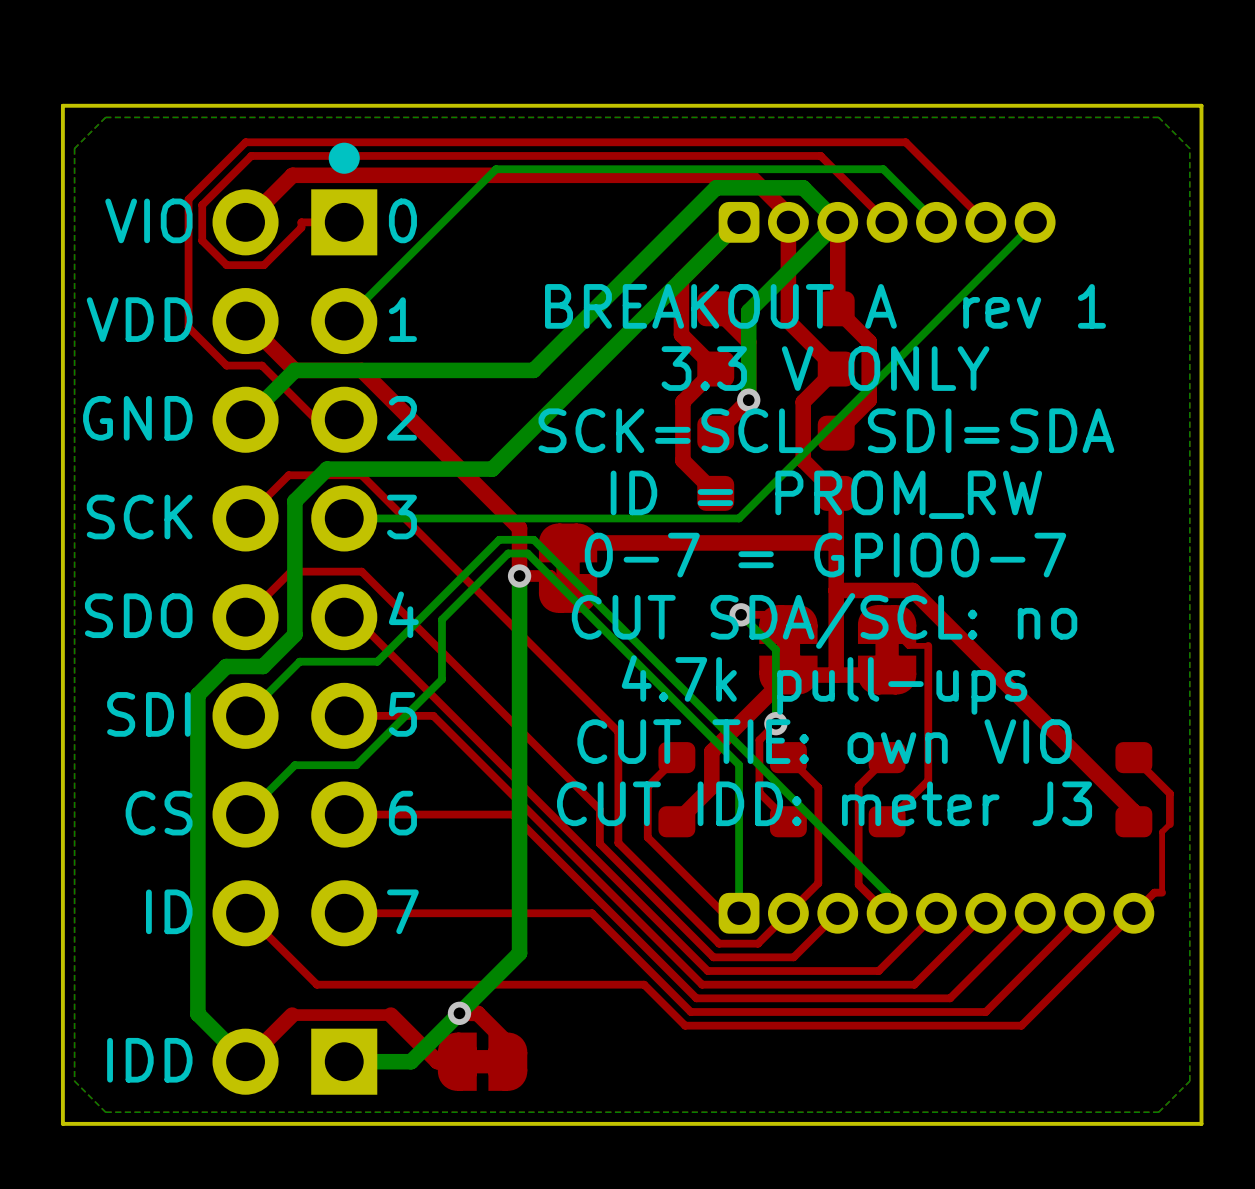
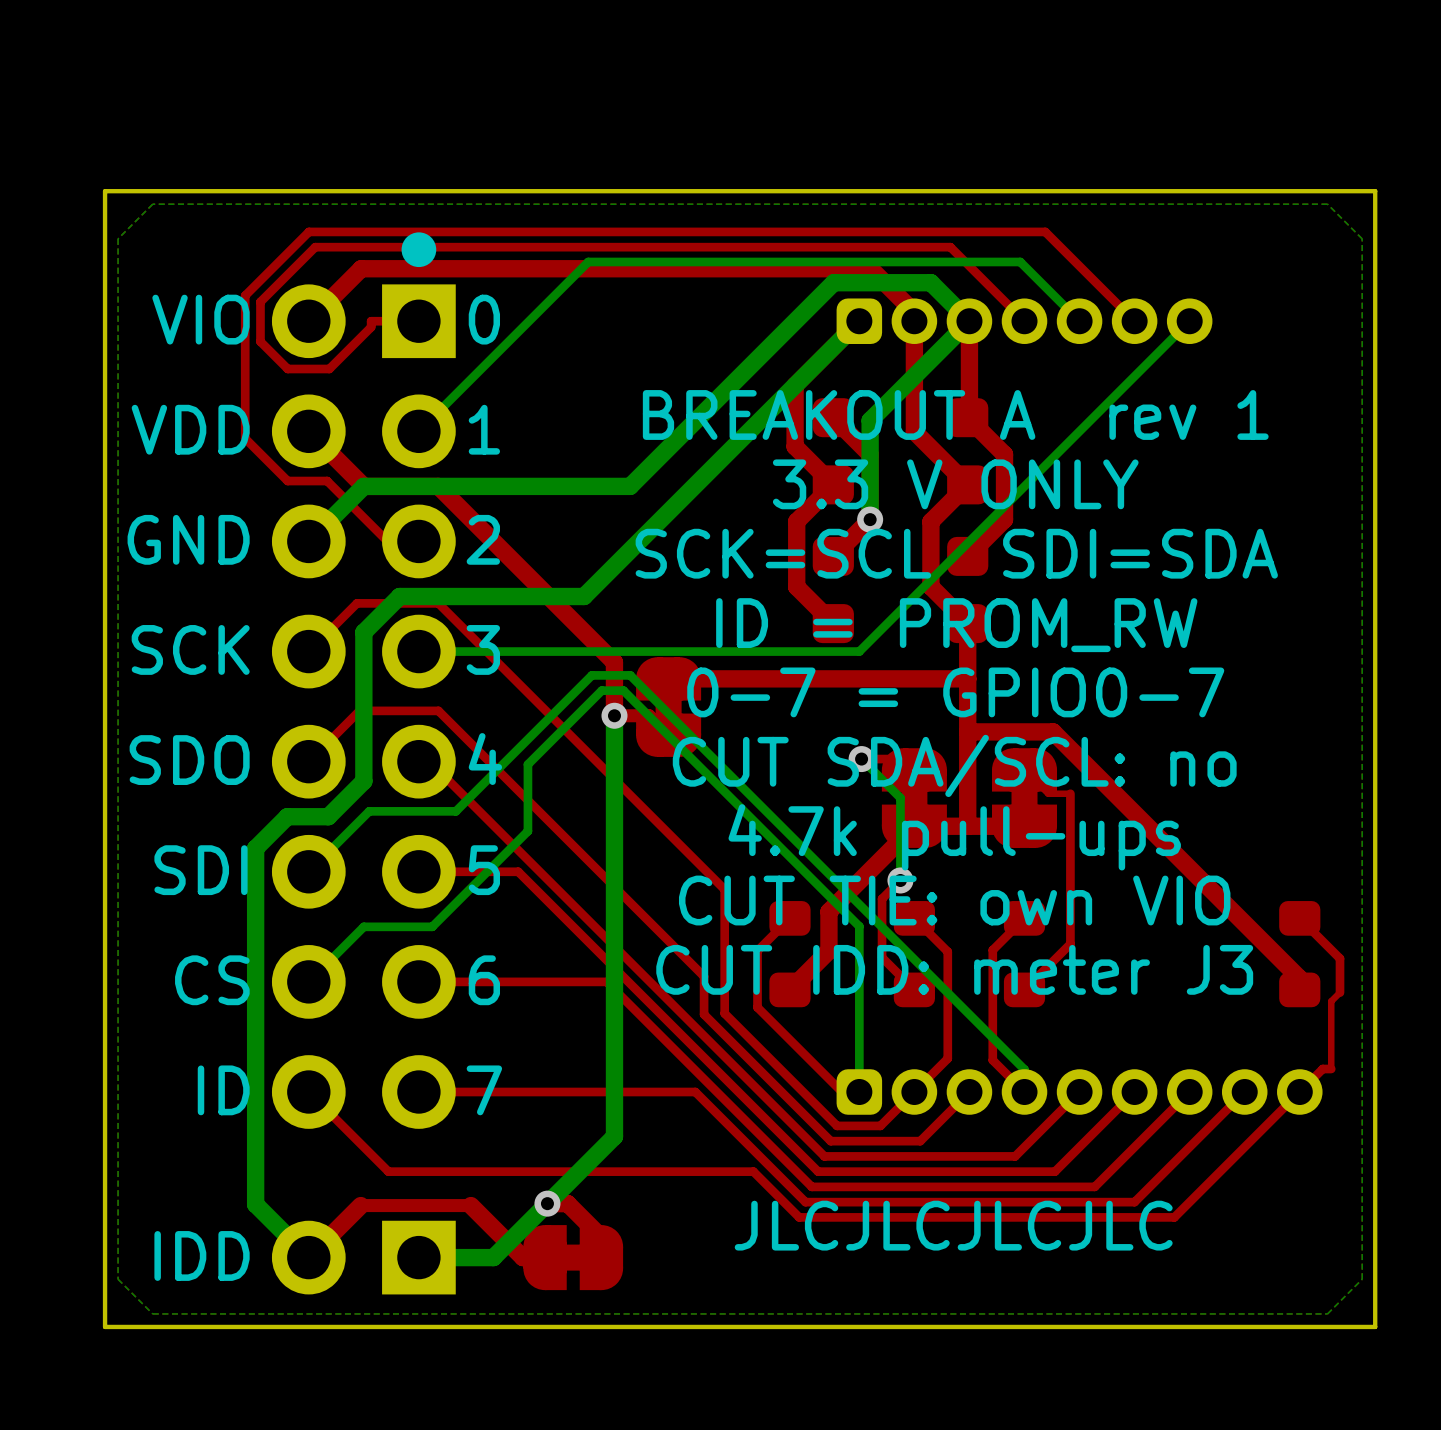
text: none -> JLCJLCJLCJLC (953, 1225)

